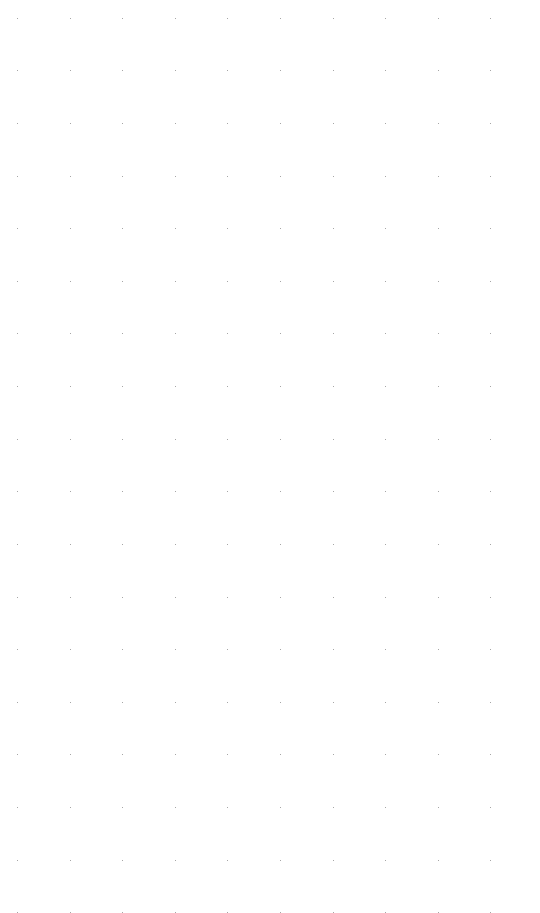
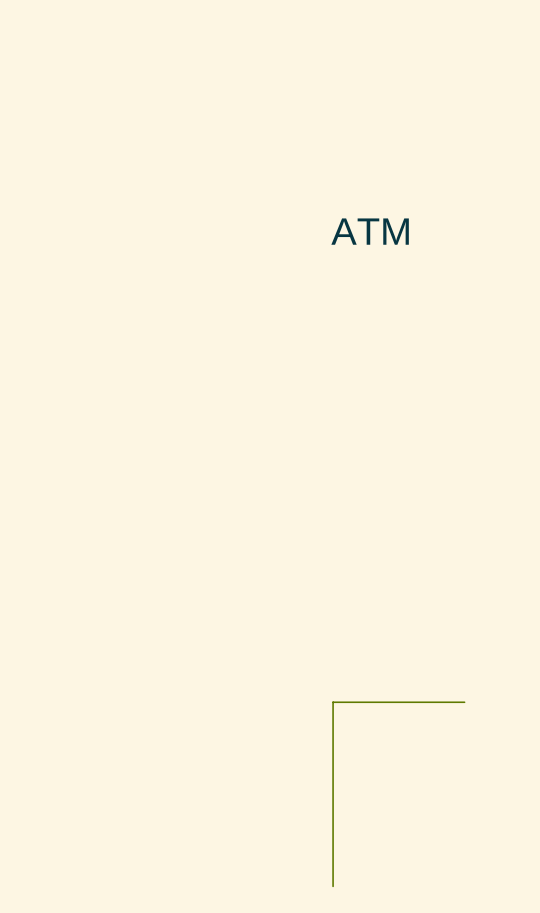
label: none -> ATM (370, 231)
wire: none -> (464, 702) (333, 702) (333, 886)

